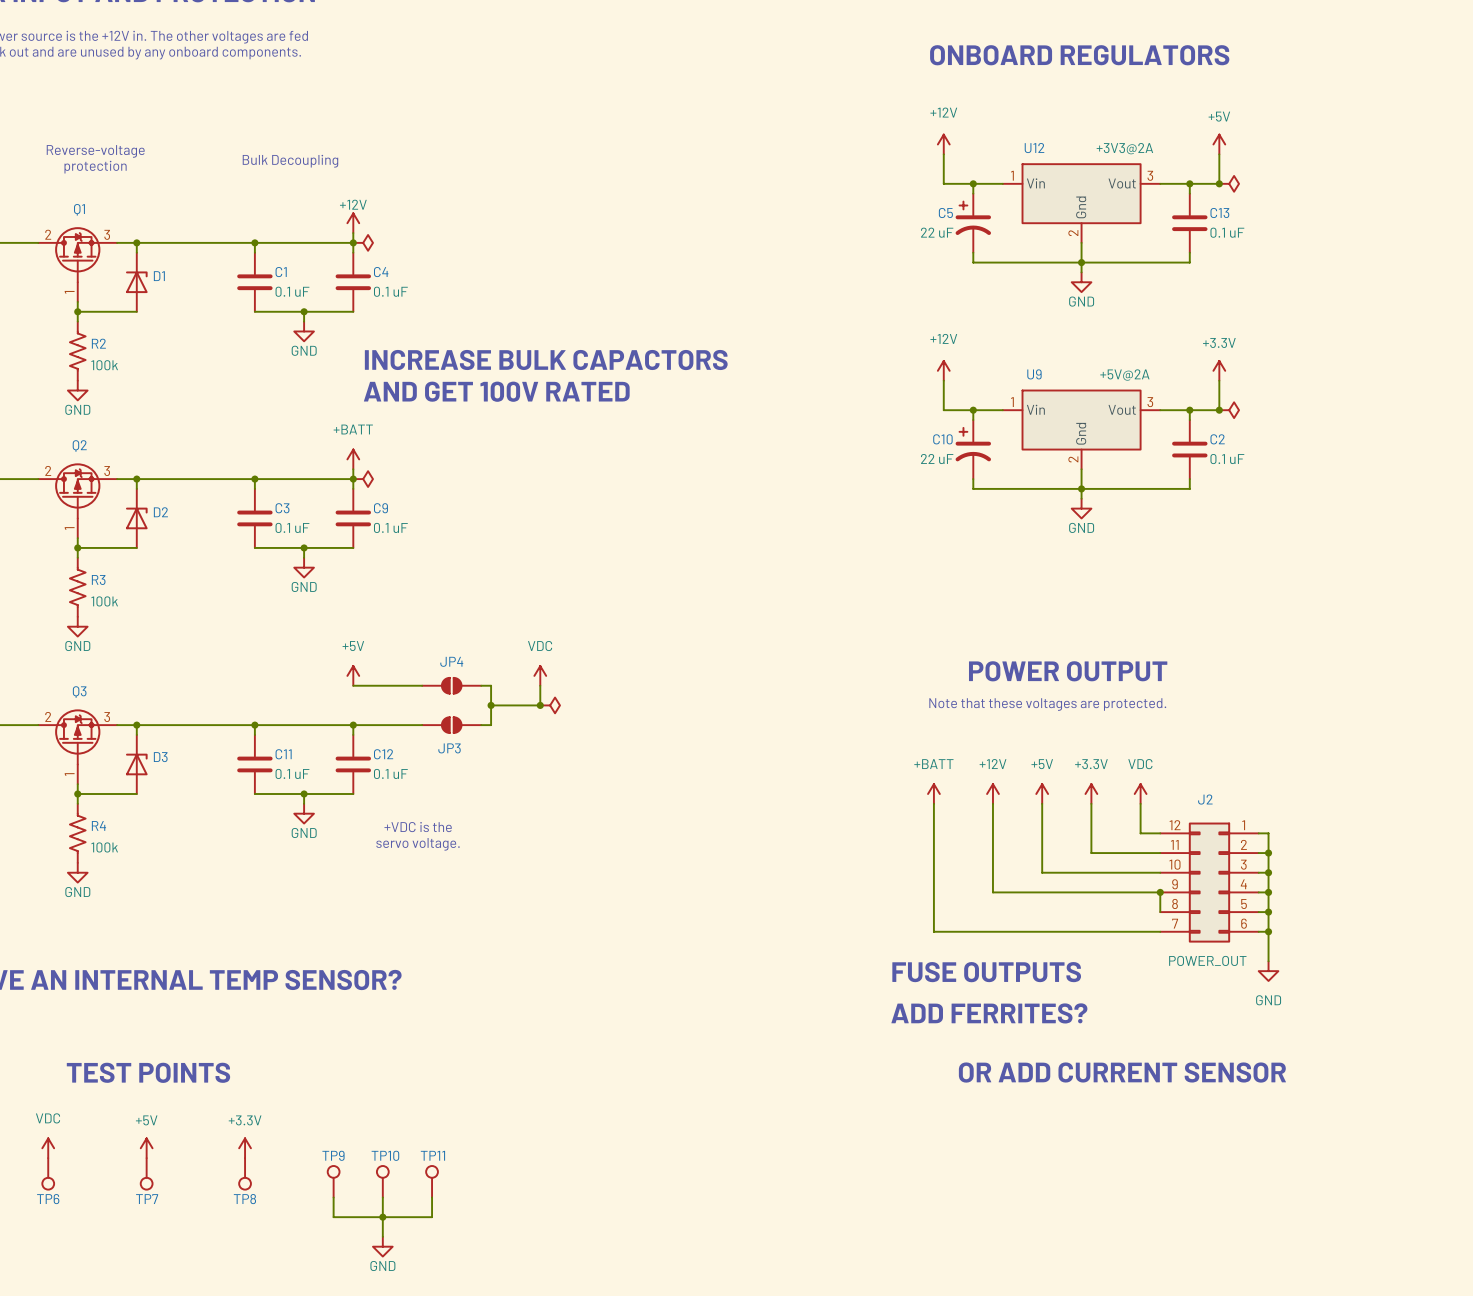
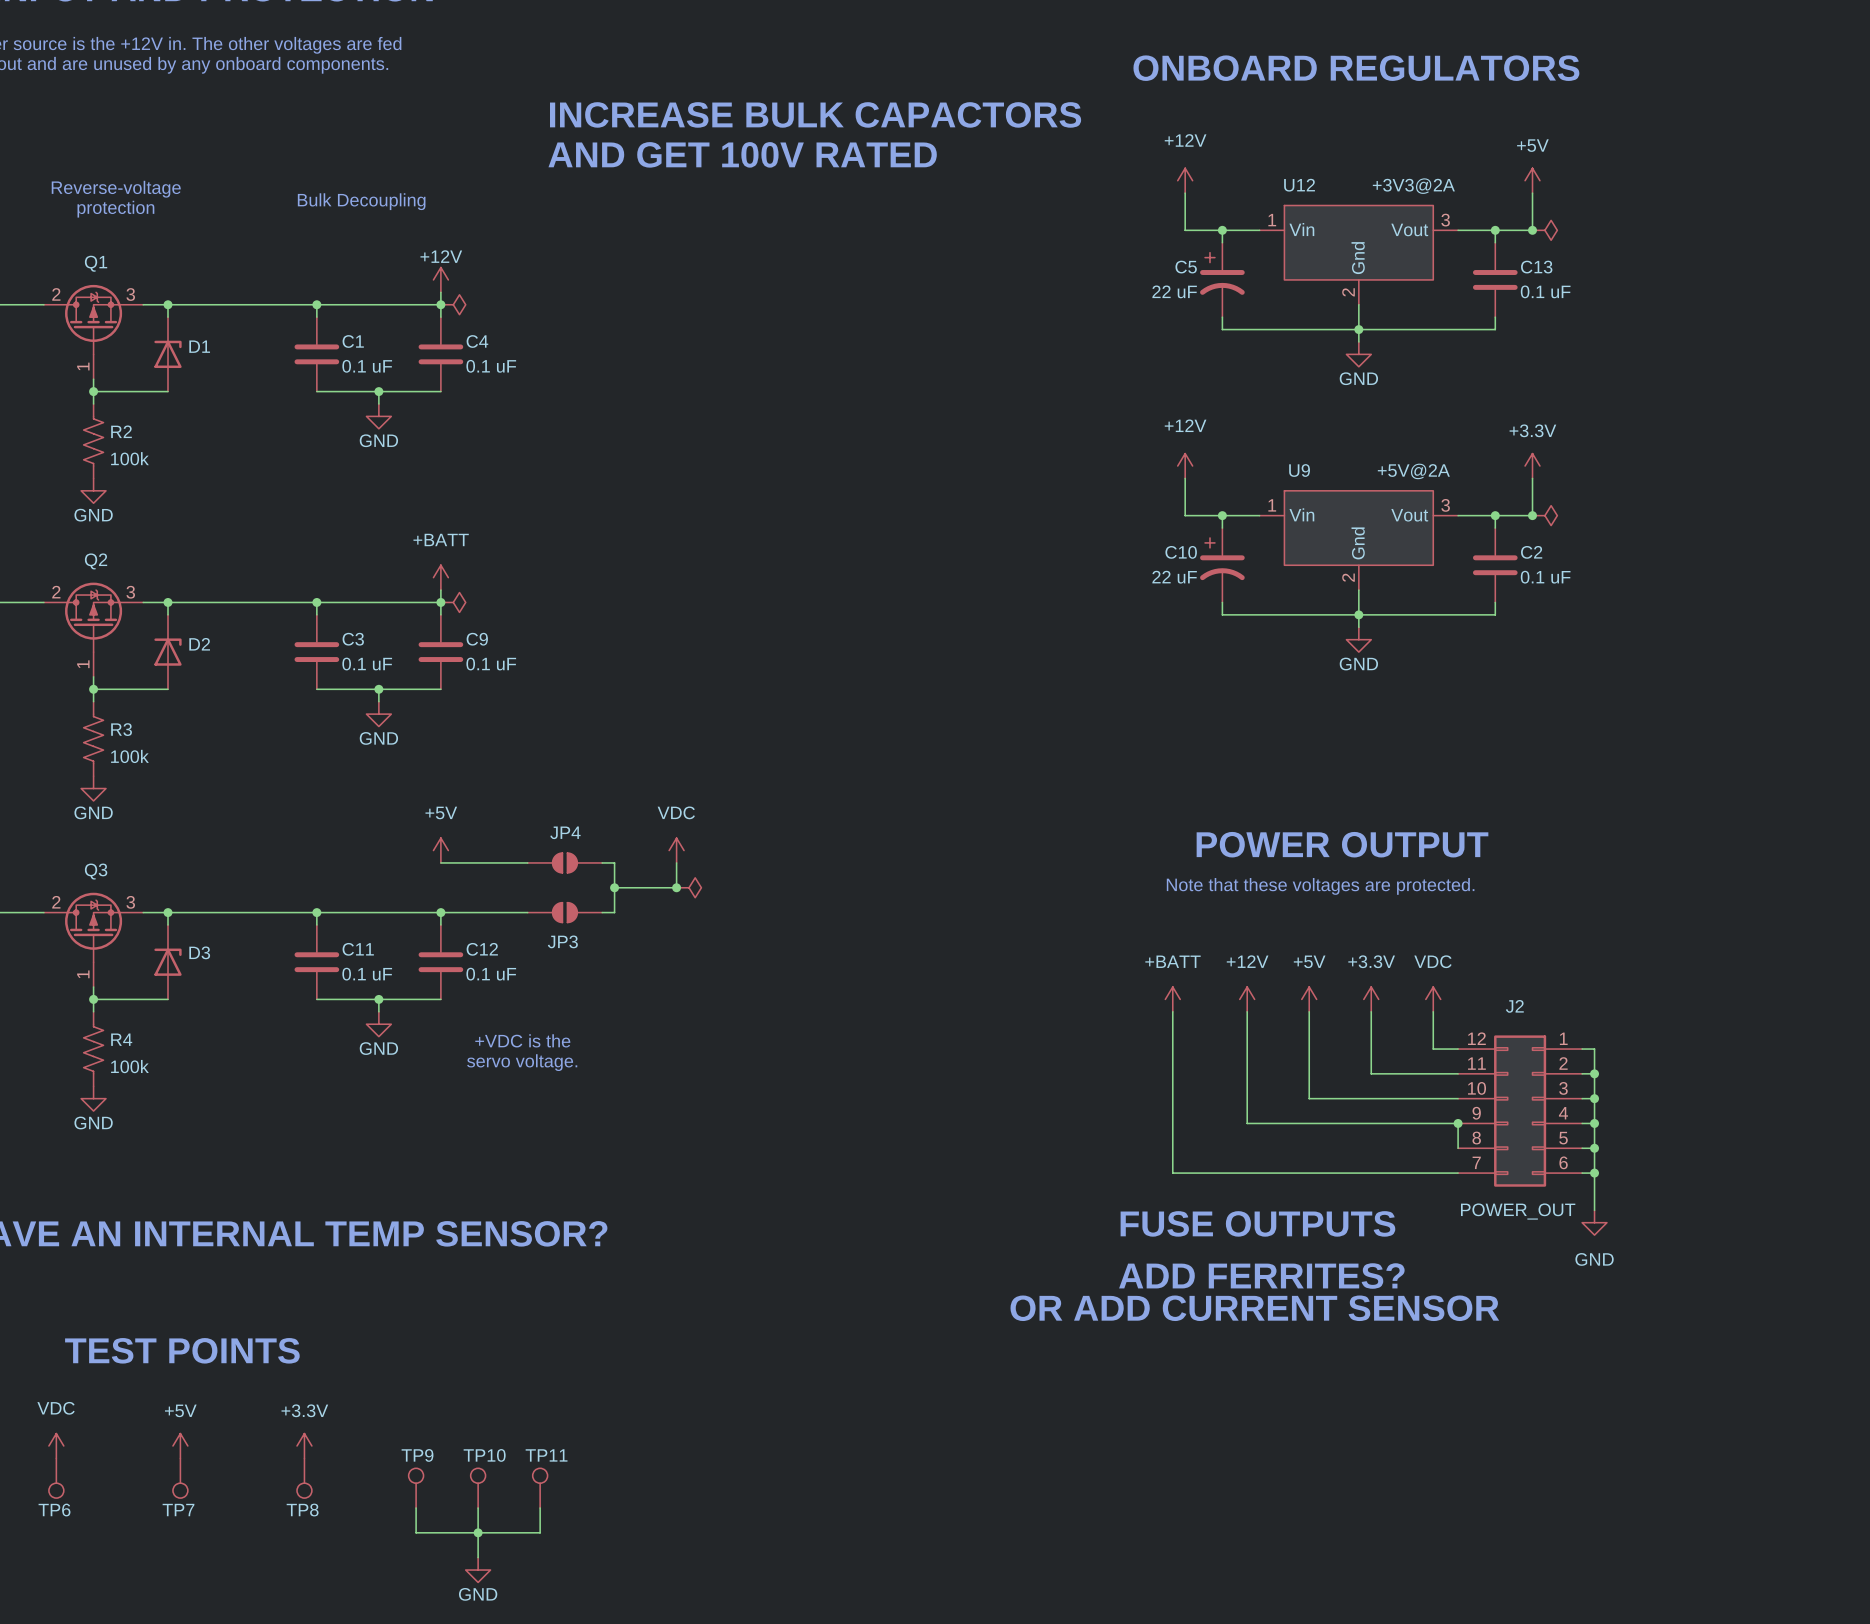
text: none -> INCREASE BULK CAPACTORS (815, 114)
text: none -> AND GET 100V RATED (742, 154)
text: INCREASE BULK CAPACTORS (546, 360) -> none
text: AND GET 100V RATED (496, 391) -> none
text position: OR ADD CURRENT SENSOR (1122, 1072) -> OR ADD CURRENT SENSOR (1254, 1308)

